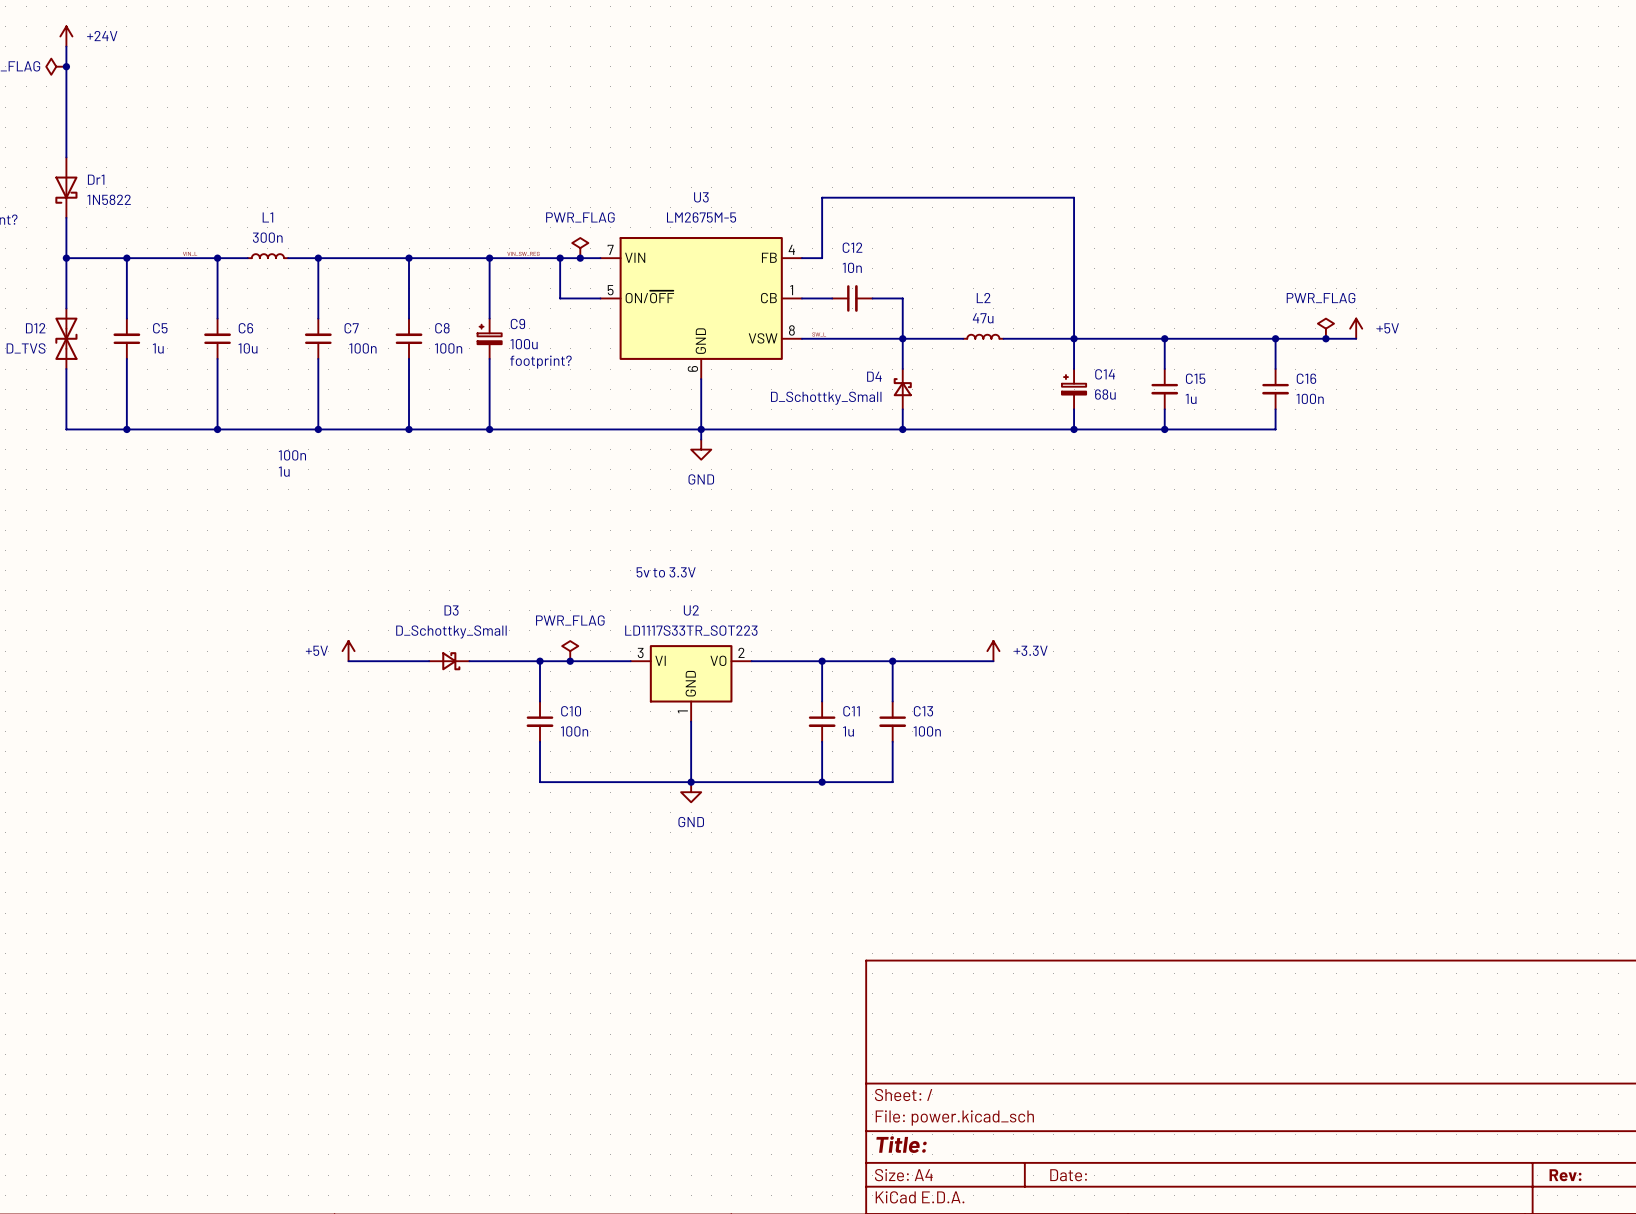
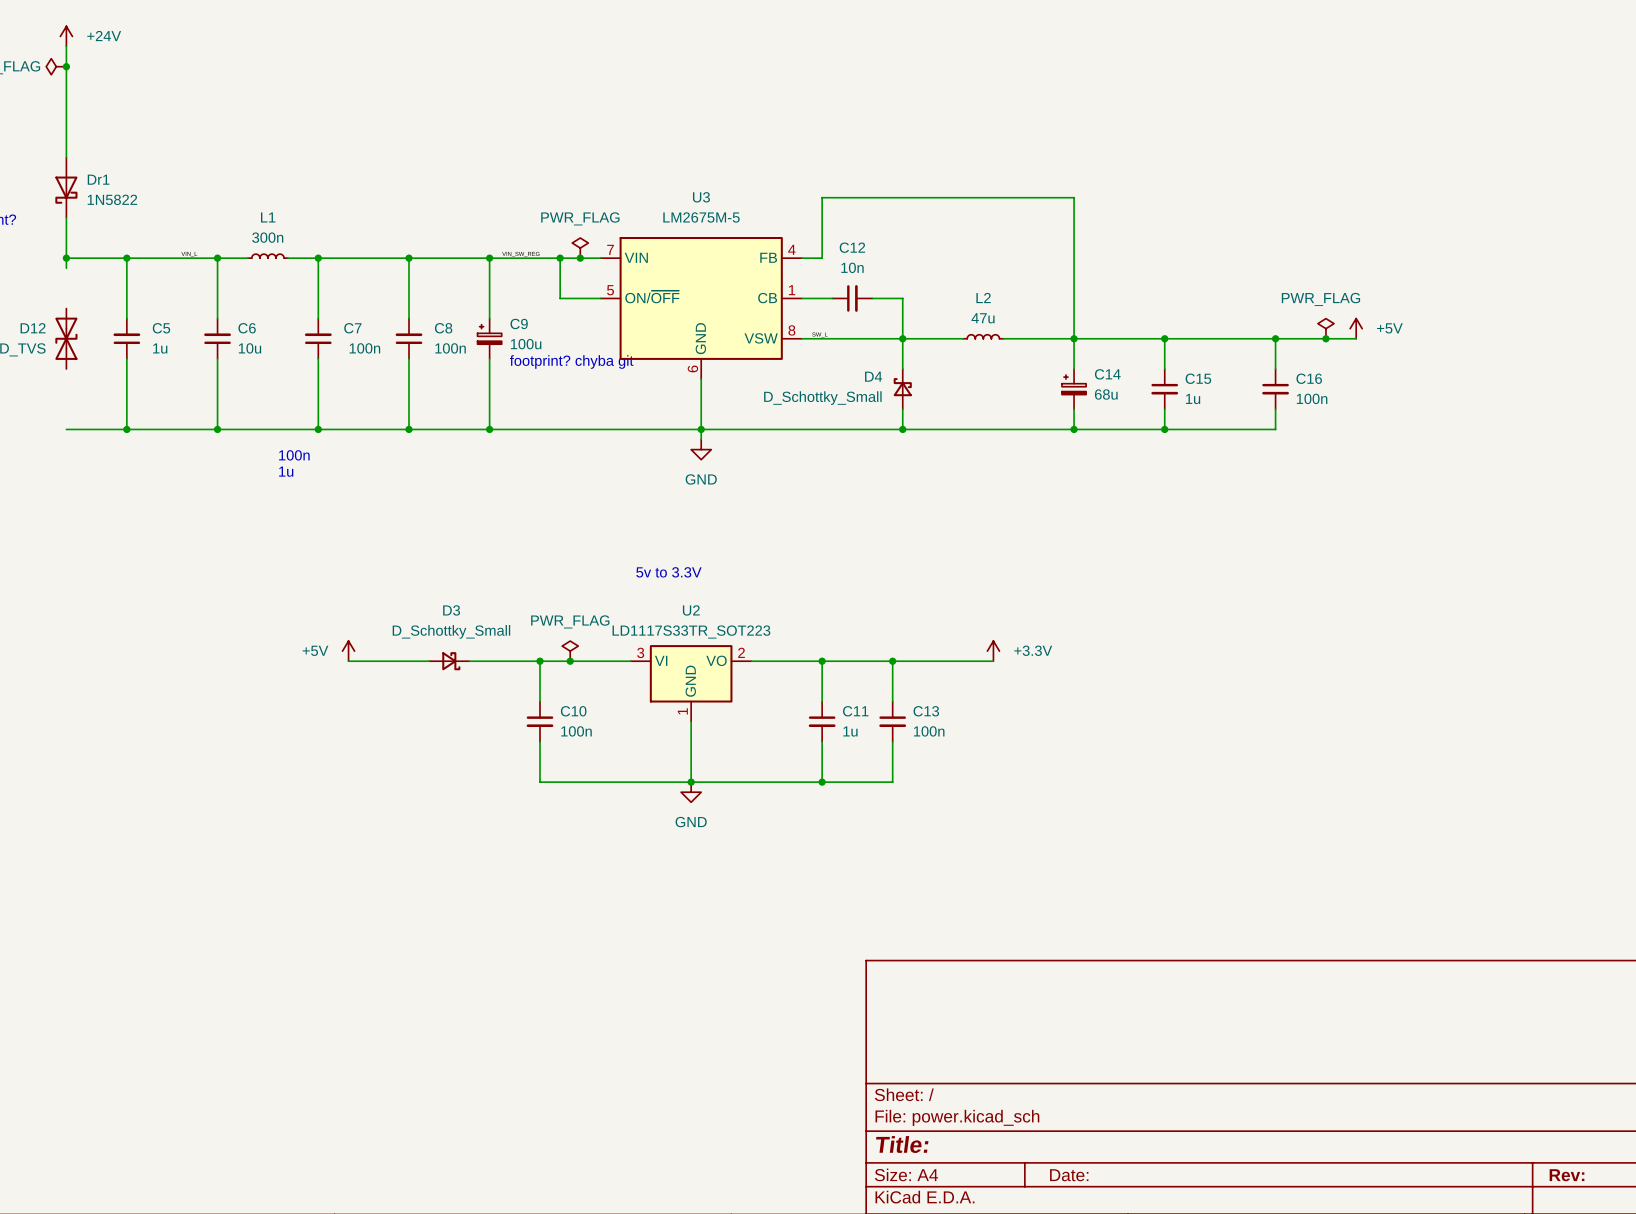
wire: (66, 268) (66, 308) -> none
text: footprint? (540, 362) -> footprint? chyba git (571, 361)
wire: (66, 369) (66, 429) -> none

